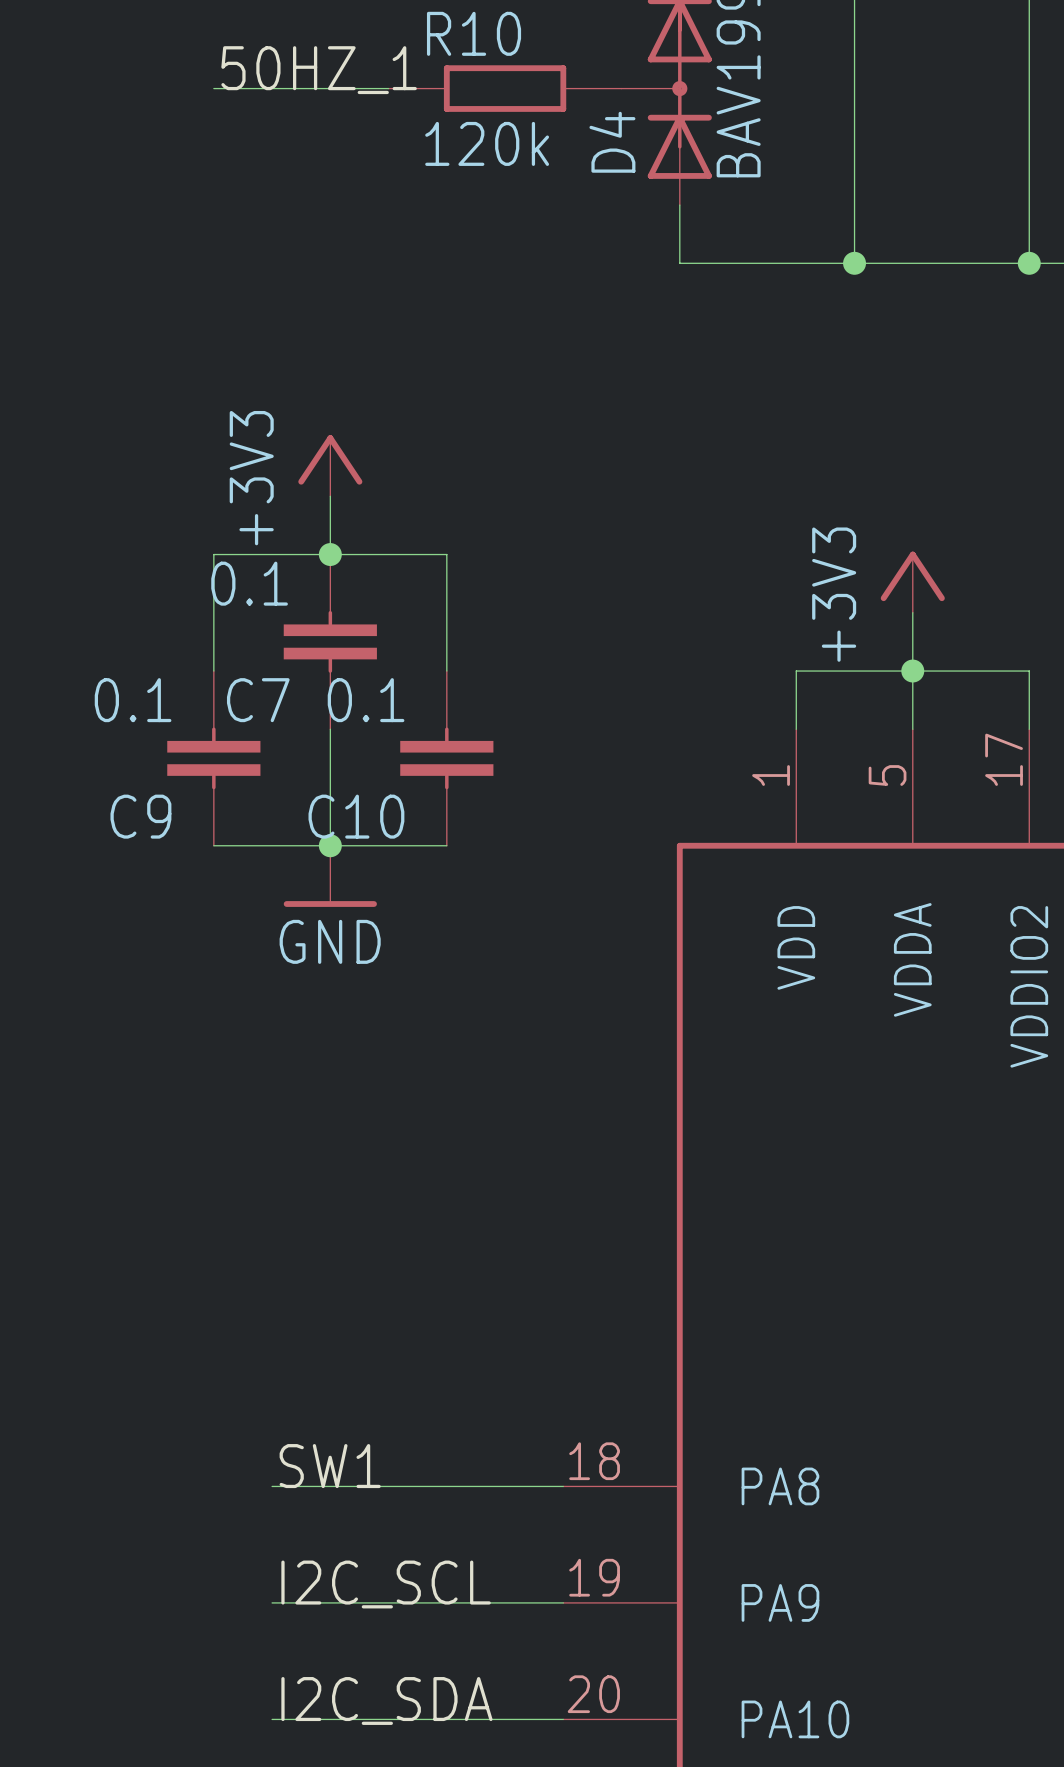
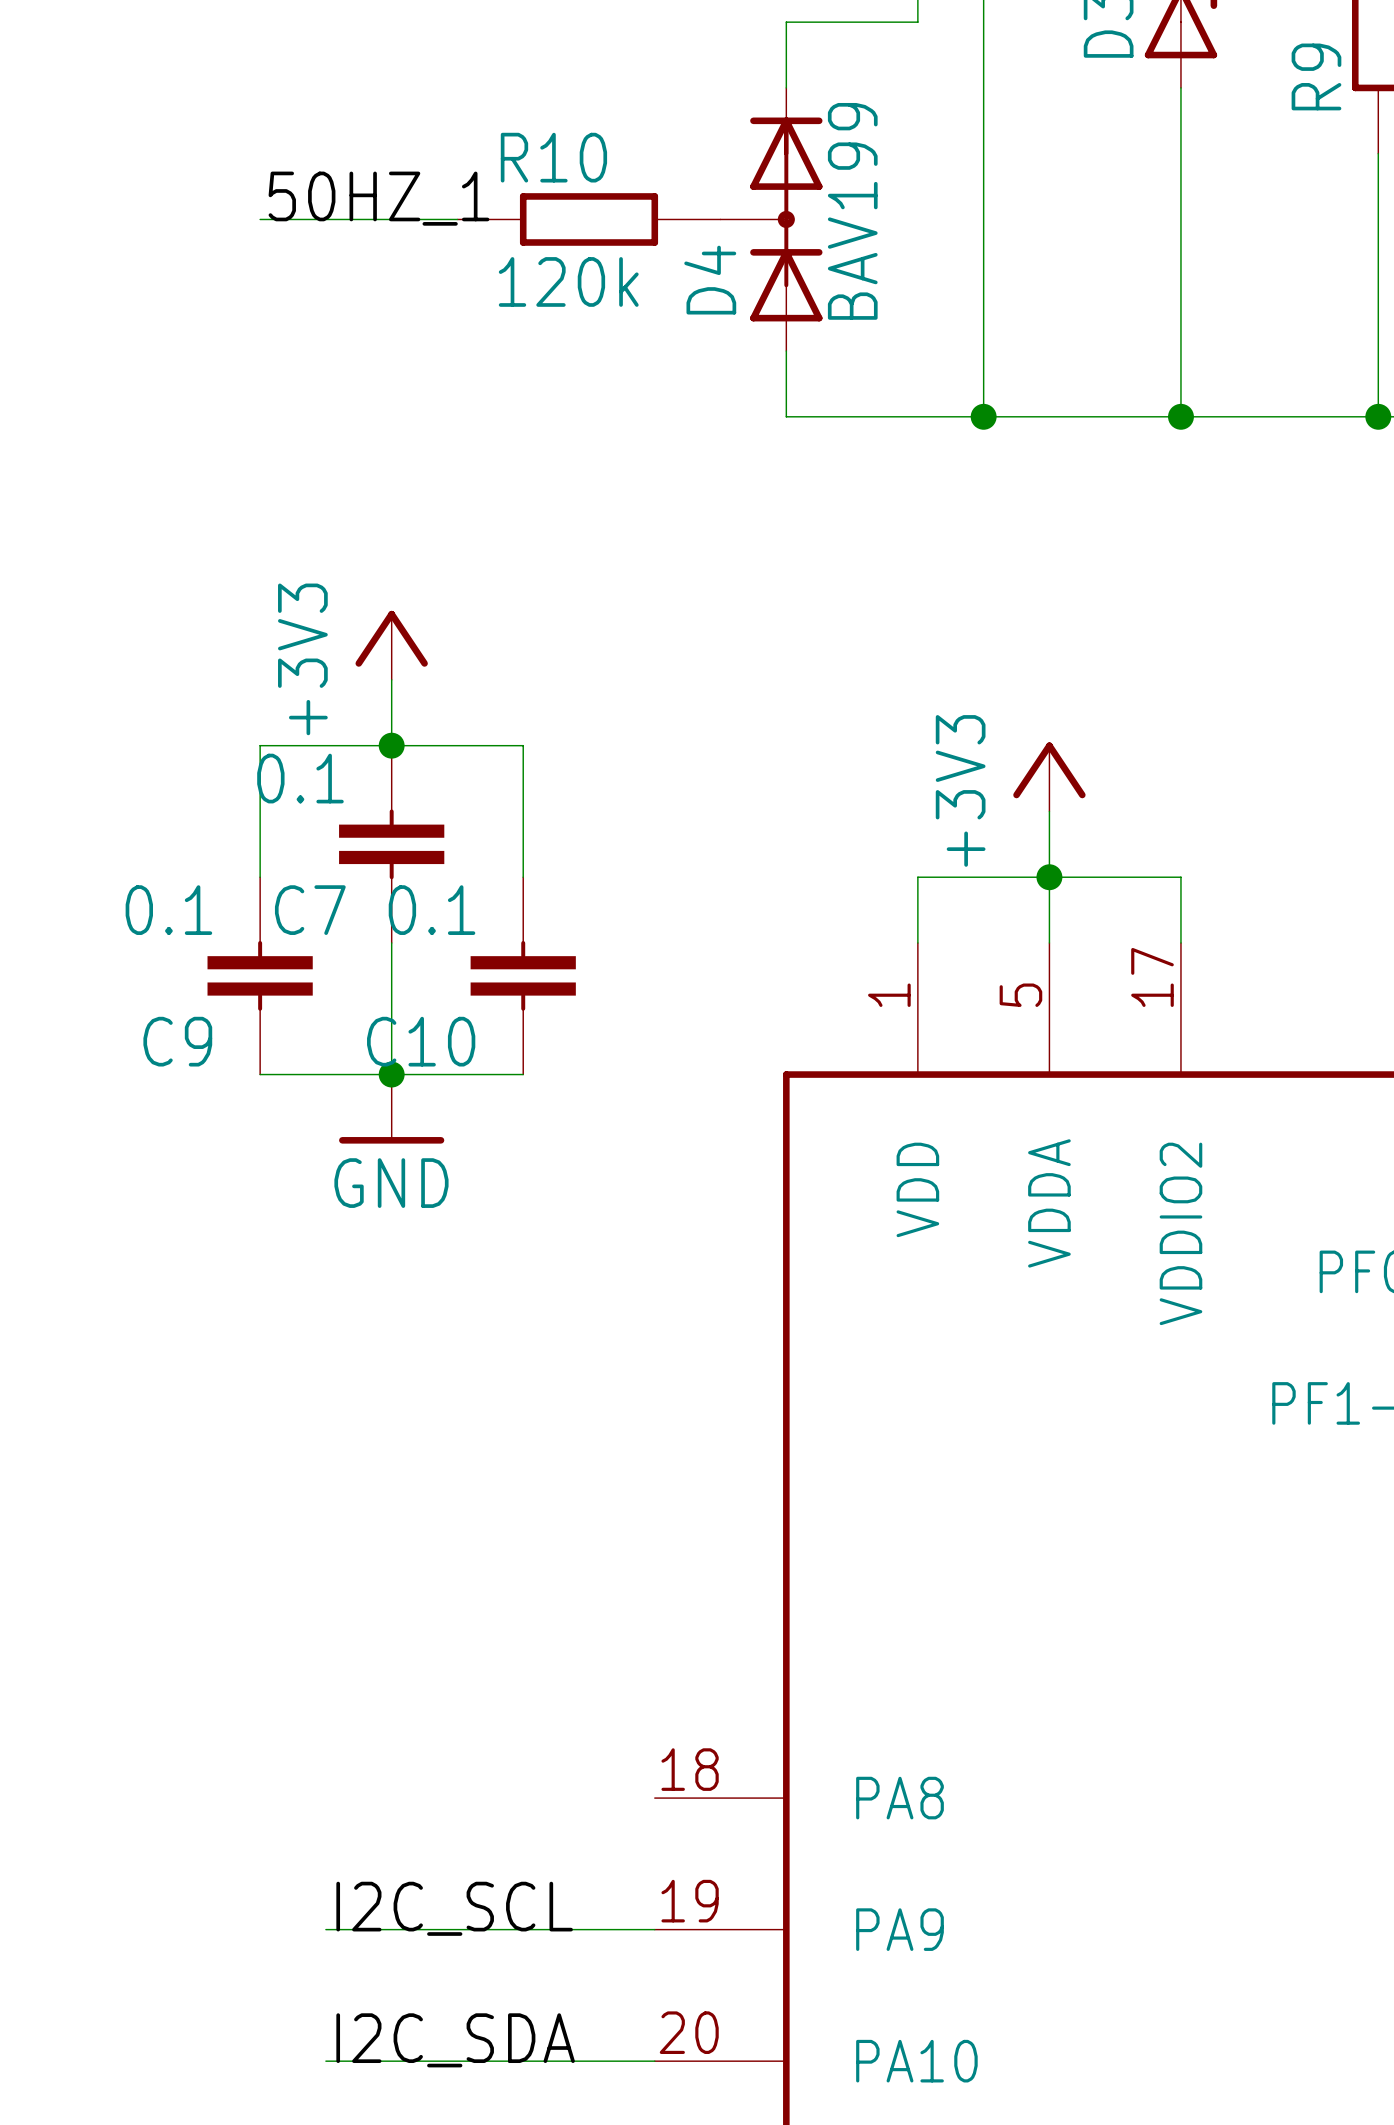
label: SW1 (330, 1466) -> none
wire: (272, 1486) (563, 1486) -> none

